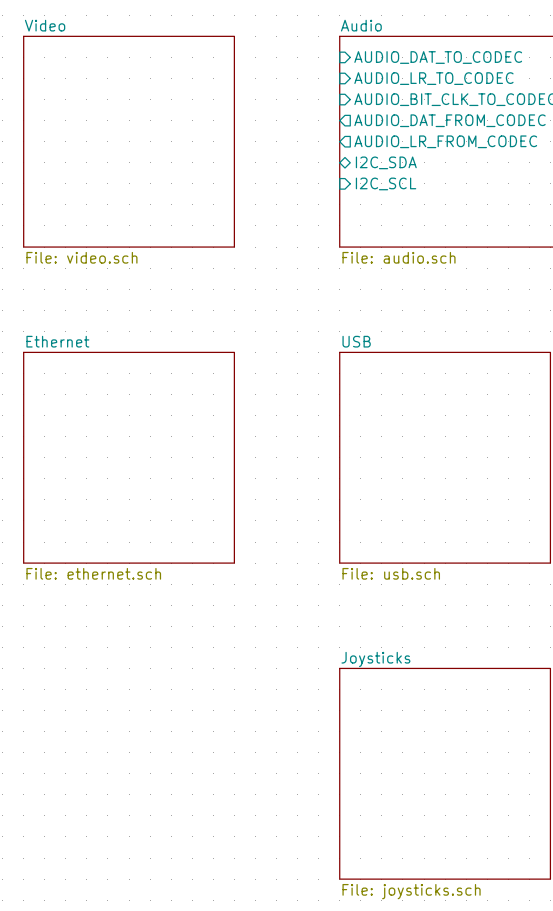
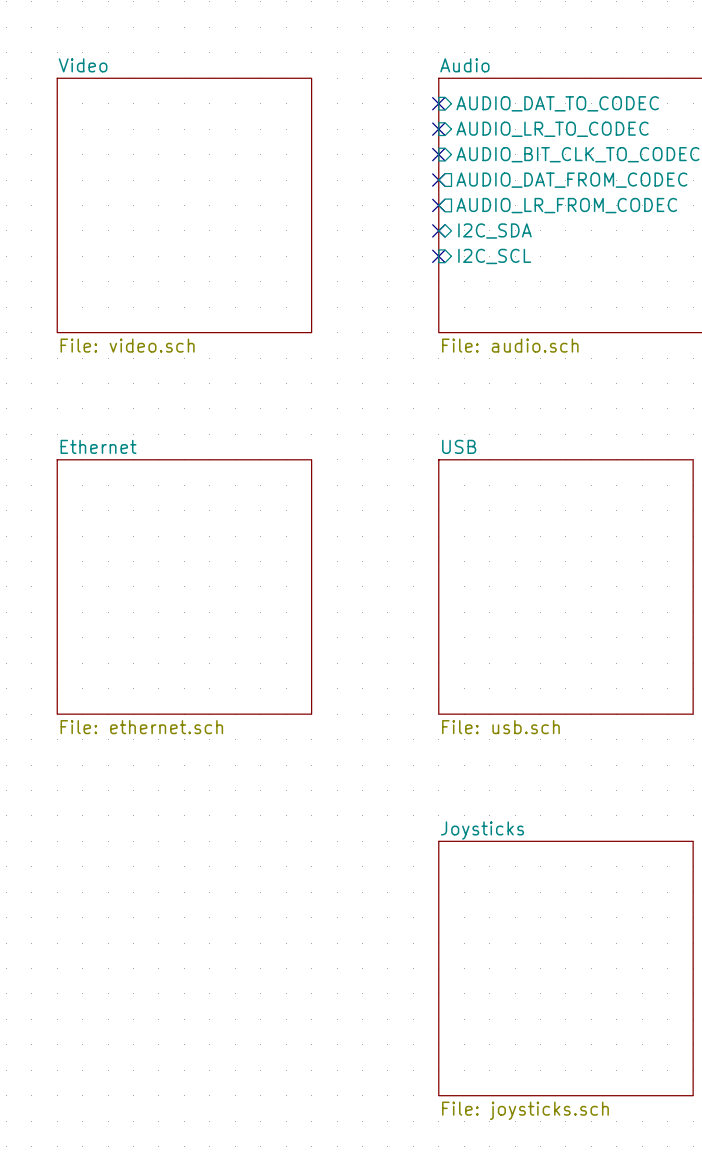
no-connect mark: none -> (438, 103)
no-connect mark: none -> (438, 129)
no-connect mark: none -> (438, 154)
no-connect mark: none -> (438, 180)
no-connect mark: none -> (438, 205)
no-connect mark: none -> (438, 230)
no-connect mark: none -> (438, 256)

